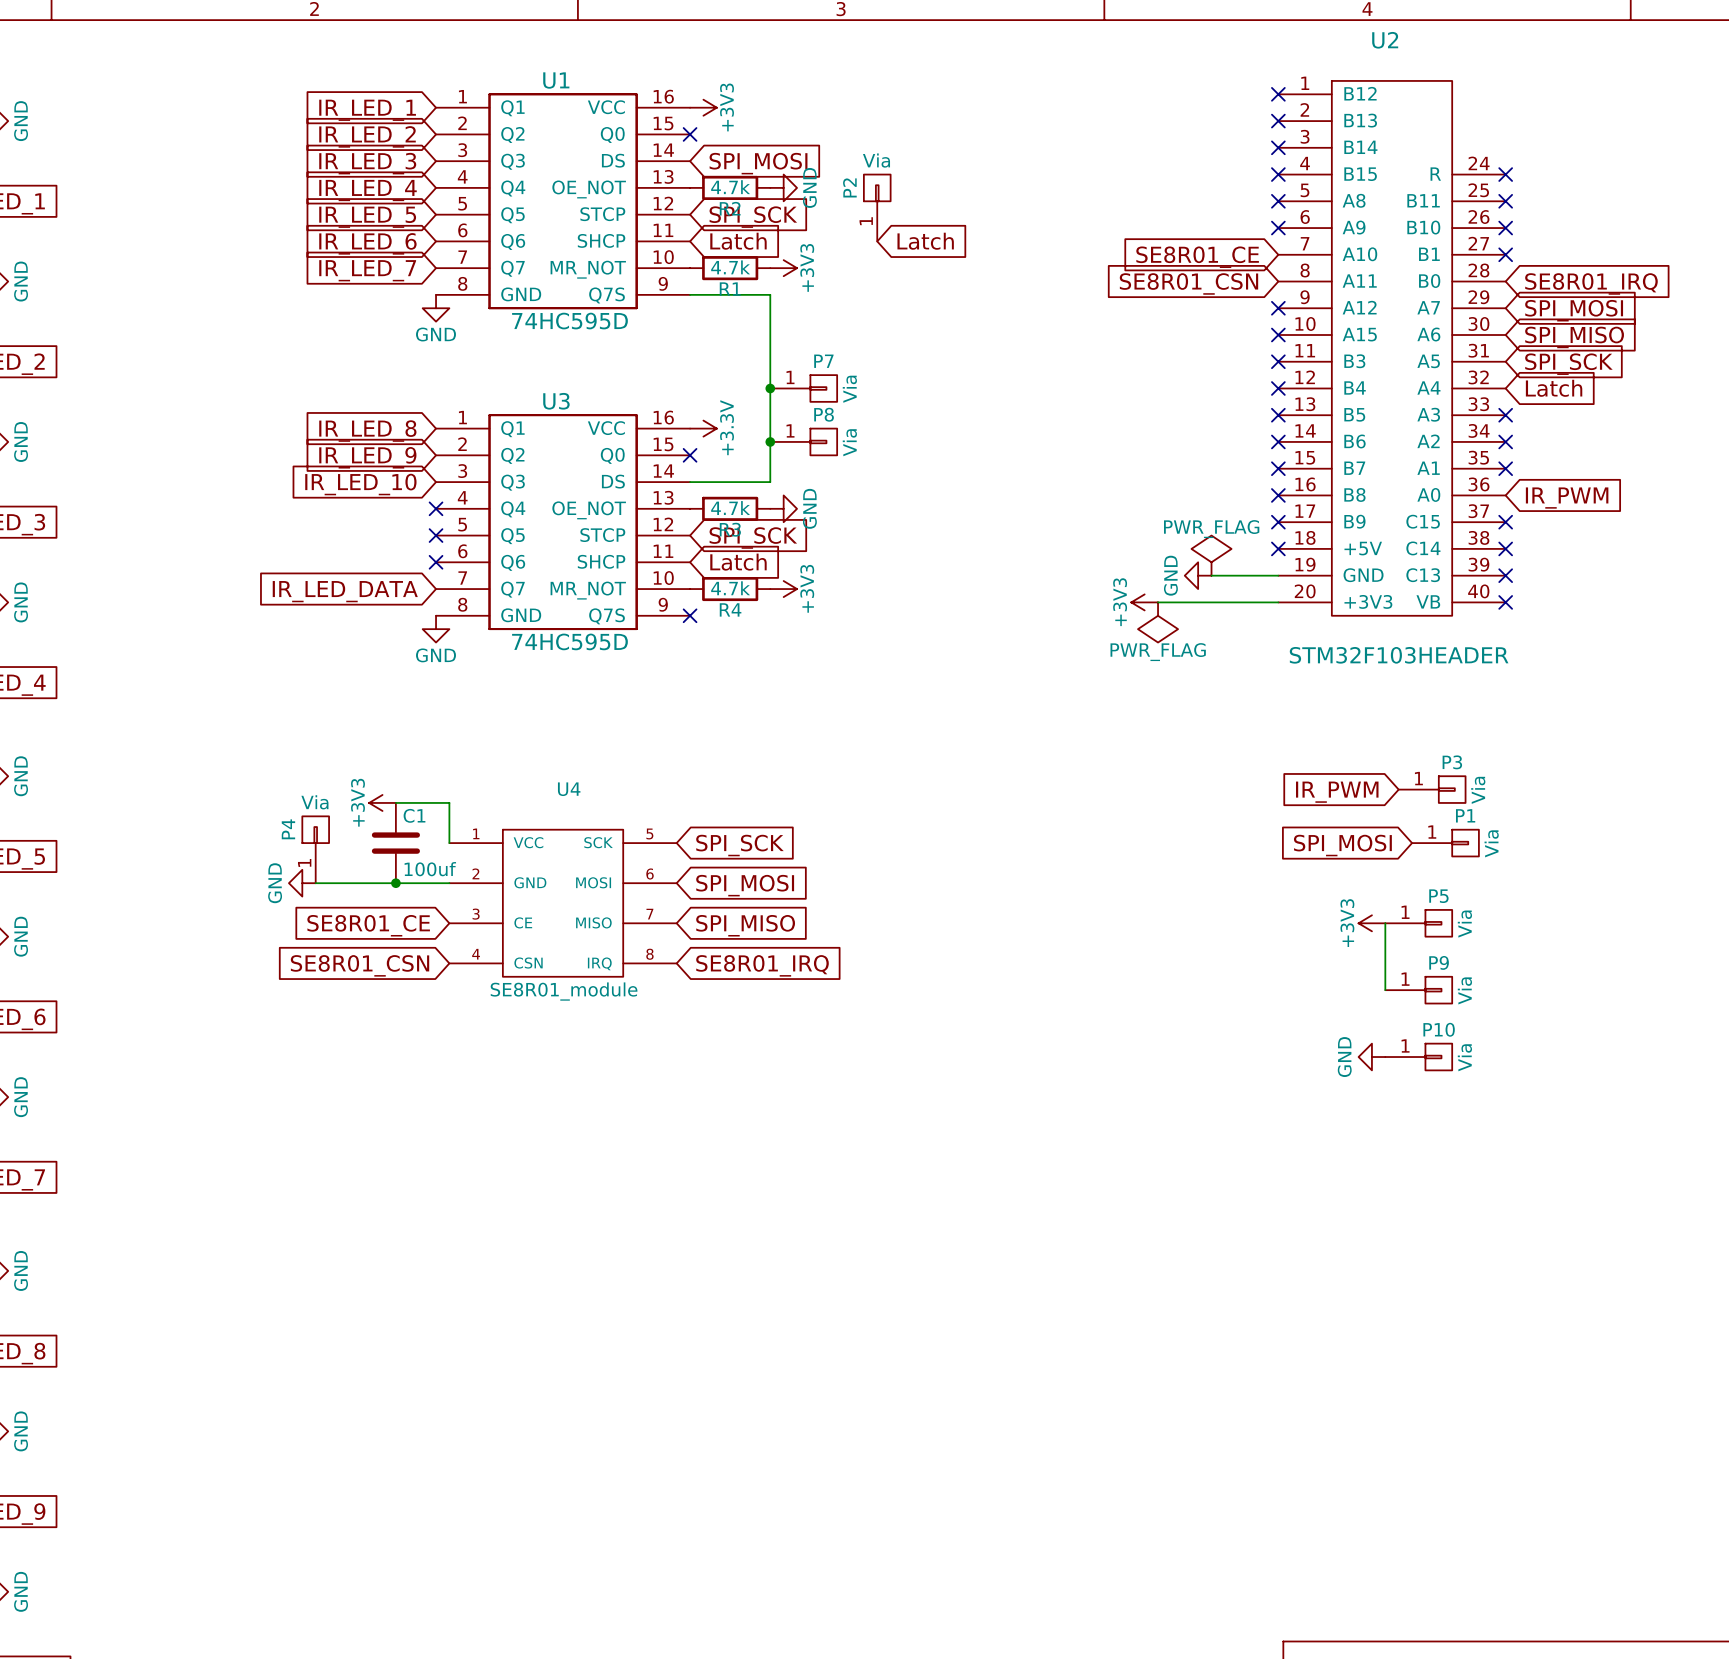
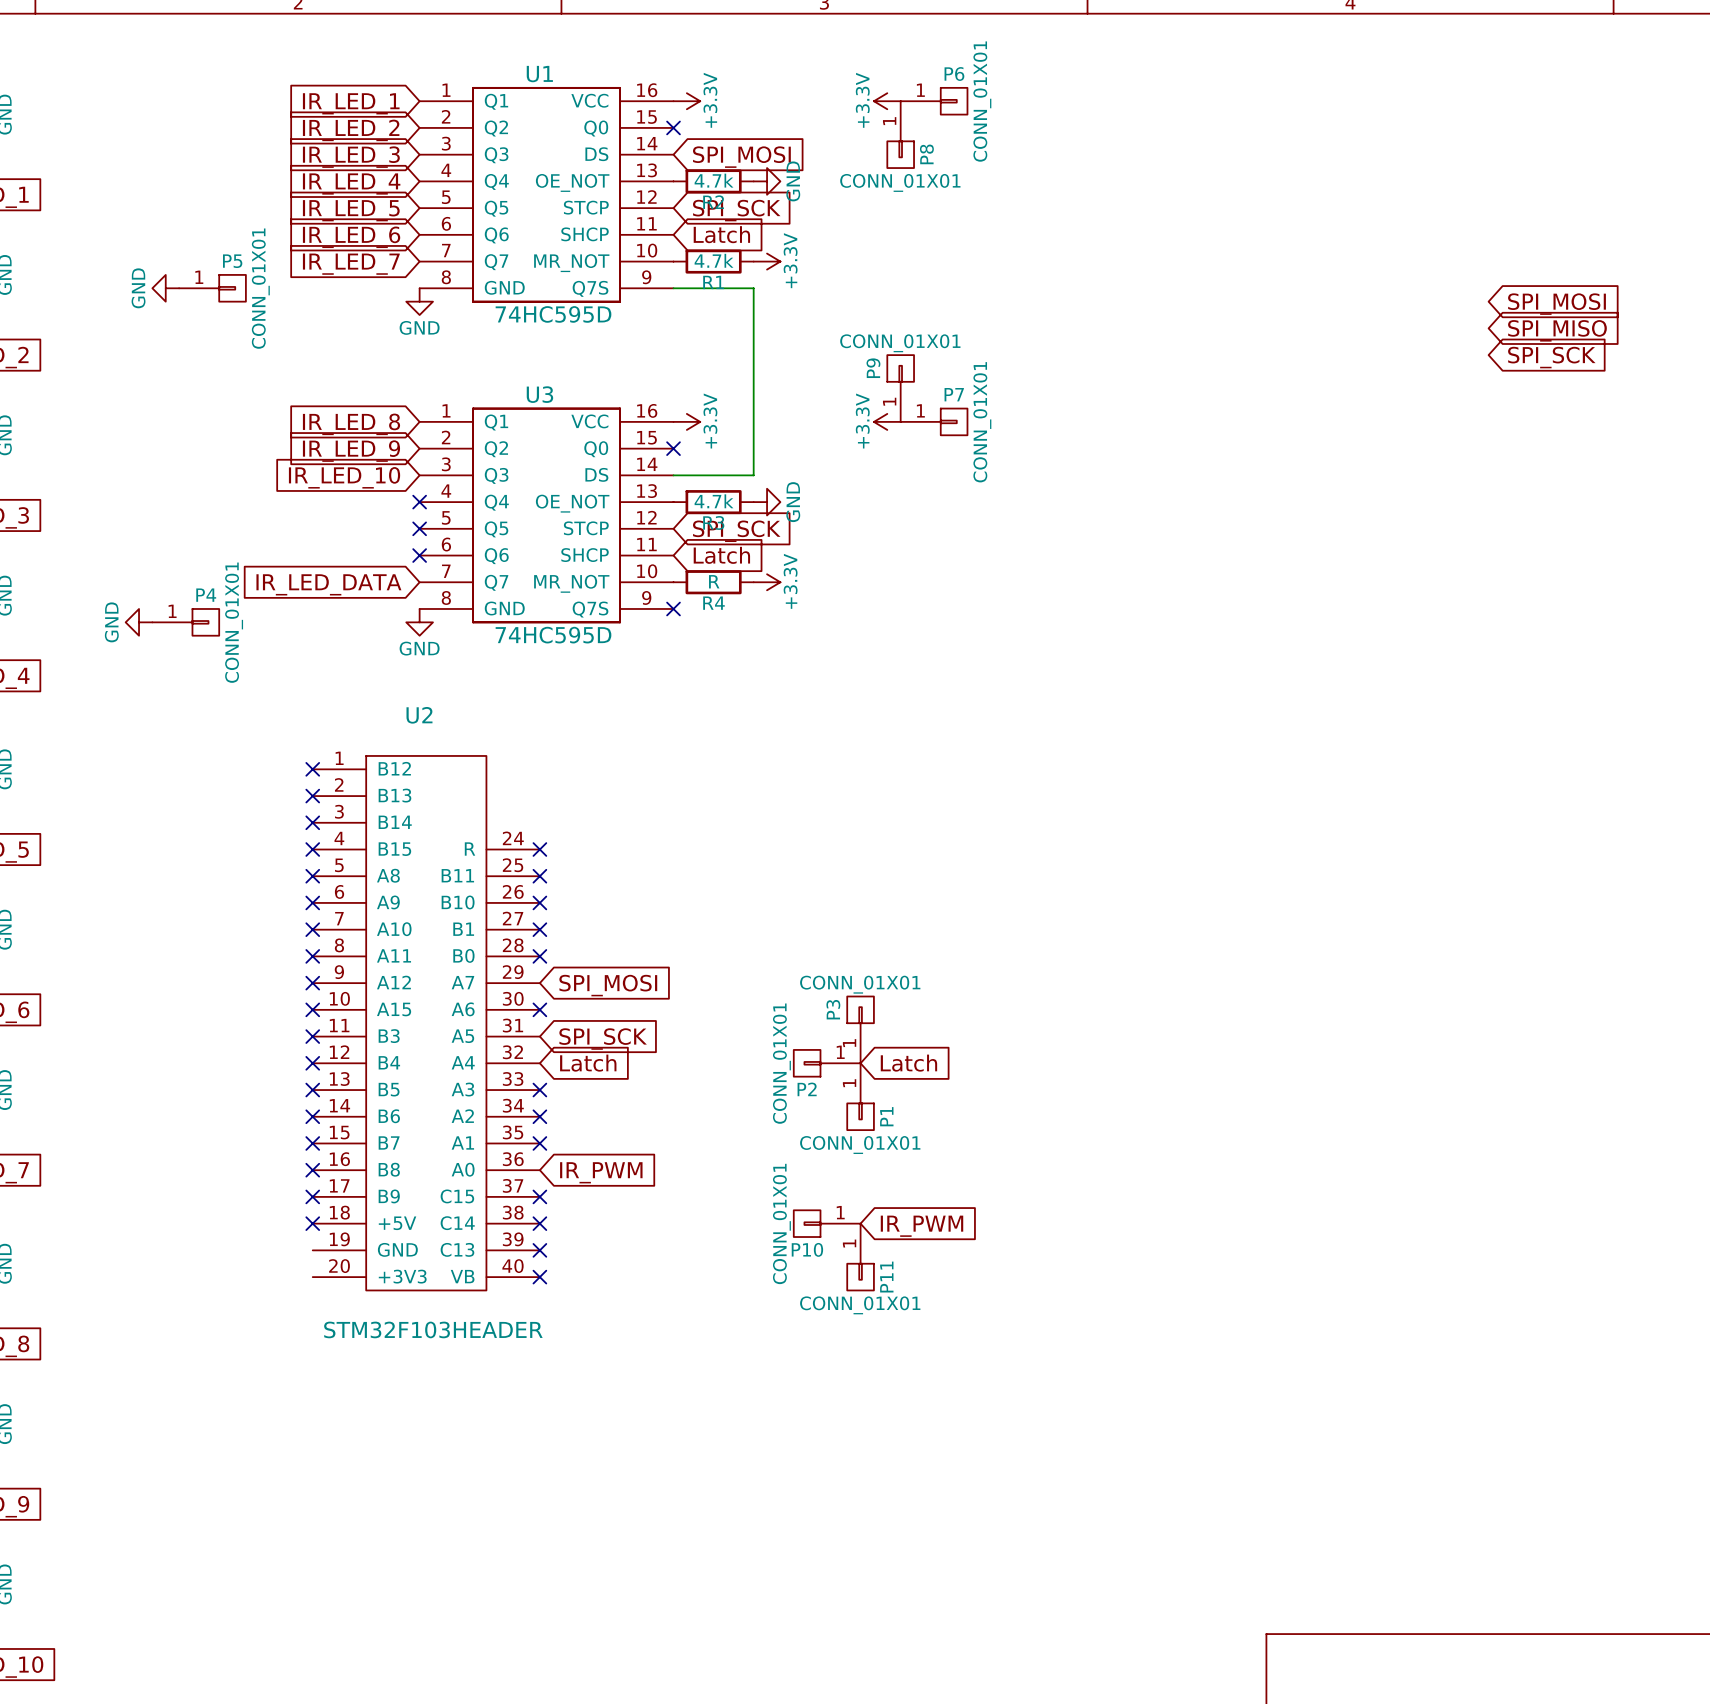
no-connect mark: (1278, 94) -> none
power symbol: +3V3 (703, 107) -> +3.3V (686, 101)
power symbol: none -> +3.3V (887, 101)
P6: none -> CONN_01X01 (934, 101)
no-connect mark: (1278, 121) -> none
no-connect mark: (1278, 147) -> none
P2 value: Via (876, 160) -> CONN_01X01 (781, 1063)
no-connect mark: (1278, 174) -> none
no-connect mark: (1505, 174) -> none
P2 rotation: 0° (877, 187) -> 90° counterclockwise (807, 1063)
no-connect mark: (1278, 201) -> none
no-connect mark: (1505, 201) -> none
P2 position: (877, 207) -> (827, 1063)
no-connect mark: (1278, 228) -> none
no-connect mark: (1505, 228) -> none
global label: Latch (925, 241) -> none
no-connect mark: (1505, 254) -> none
global label: SE8R01_CE (1197, 257) -> none
power symbol: +3V3 (783, 268) -> +3.3V (767, 261)
global label: SE8R01_CSN (1188, 283) -> none
global label: SE8R01_IRQ (1591, 283) -> none
power symbol: none -> GND (165, 288)
no-connect mark: (1278, 308) -> none
no-connect mark: (1278, 335) -> none
U2 position: (1392, 348) -> (426, 1023)
no-connect mark: (1278, 361) -> none
junction: (770, 388) -> none
P7 position: (803, 388) -> (934, 421)
no-connect mark: (1278, 388) -> none
global label: Latch (1554, 388) -> none
P7 value: Via (849, 389) -> CONN_01X01 (982, 422)
no-connect mark: (1278, 415) -> none
no-connect mark: (1505, 415) -> none
power symbol: none -> +3.3V (887, 421)
junction: (770, 441) -> none
P8 position: (803, 441) -> (900, 134)
P8 rotation: 0° (823, 441) -> 90° clockwise (900, 154)
no-connect mark: (1278, 441) -> none
no-connect mark: (1505, 441) -> none
P8 value: Via (849, 442) -> CONN_01X01 (900, 182)
no-connect mark: (1278, 468) -> none
no-connect mark: (1505, 468) -> none
no-connect mark: (1278, 495) -> none
global label: IR_PWM (1567, 498) -> none
no-connect mark: (1278, 522) -> none
no-connect mark: (1505, 522) -> none
no-connect mark: (1278, 548) -> none
no-connect mark: (1505, 548) -> none
power symbol: PWR_FLAG (1211, 555) -> none
power symbol: GND (1198, 575) -> none
wire: (1211, 575) (1278, 575) -> none
no-connect mark: (1505, 575) -> none
R4 value: 4.7k (730, 588) -> R (714, 581)
power symbol: +3V3 (783, 589) -> +3.3V (767, 582)
power symbol: +3V3 (1144, 602) -> none
wire: (1158, 602) (1278, 602) -> none
no-connect mark: (1505, 602) -> none
power symbol: PWR_FLAG (1158, 622) -> none
power symbol: none -> GND (139, 622)
no-connect mark: none -> (312, 769)
P3 position: (1432, 789) -> (860, 1029)
P3 rotation: 0° (1452, 789) -> 90° counterclockwise (860, 1009)
P3 value: Via (1478, 790) -> CONN_01X01 (860, 984)
global label: IR_PWM (1337, 792) -> none
P4 value: Via (314, 802) -> CONN_01X01 (234, 622)
no-connect mark: none -> (312, 796)
power symbol: +3V3 (382, 802) -> none
wire: (395, 802) (449, 802) (449, 843) -> none
P4 rotation: 0° (315, 829) -> 90° clockwise (205, 622)
no-connect mark: none -> (312, 822)
C1: 100uf (395, 843) -> none
P1 position: (1445, 843) -> (860, 1096)
P1 rotation: 0° (1465, 843) -> 90° clockwise (860, 1116)
P1 value: Via (1491, 843) -> CONN_01X01 (860, 1145)
global label position: SPI_SCK (739, 845) -> SPI_SCK (603, 1039)
global label: SPI_MOSI (1342, 845) -> none
P4 position: (315, 849) -> (185, 622)
no-connect mark: none -> (312, 849)
no-connect mark: none -> (539, 849)
power symbol: GND (302, 883) -> none
wire: (315, 883) (449, 883) -> none
no-connect mark: none -> (312, 876)
junction: (395, 883) -> none
no-connect mark: none -> (539, 876)
global label position: SPI_MOSI (745, 885) -> SPI_MOSI (608, 985)
U4: SE8R01_module (563, 903) -> none
no-connect mark: none -> (312, 902)
no-connect mark: none -> (539, 902)
power symbol: +3V3 (1371, 923) -> none
wire: (1385, 923) (1385, 990) -> none
P5 position: (1418, 923) -> (212, 288)
P5 value: Via (1464, 924) -> CONN_01X01 (260, 288)
global label: SE8R01_CE (368, 925) -> none
global label: SPI_MISO (745, 925) -> none
no-connect mark: none -> (312, 929)
no-connect mark: none -> (539, 929)
no-connect mark: none -> (312, 956)
no-connect mark: none -> (539, 956)
global label: SE8R01_CSN (360, 965) -> none
global label: SE8R01_IRQ (762, 965) -> none
no-connect mark: none -> (312, 983)
P9 position: (1418, 990) -> (900, 388)
P9 rotation: 0° (1438, 990) -> 90° counterclockwise (900, 368)
P9 value: Via (1464, 990) -> CONN_01X01 (900, 343)
no-connect mark: none -> (312, 1009)
no-connect mark: none -> (539, 1009)
no-connect mark: none -> (312, 1036)
power symbol: GND (1371, 1057) -> none
P10 position: (1418, 1057) -> (827, 1223)
P10 rotation: 0° (1438, 1057) -> 180° (807, 1223)
P10 value: Via (1464, 1057) -> CONN_01X01 (781, 1223)
no-connect mark: none -> (312, 1063)
global label: none -> Latch (588, 1063)
global label: none -> Latch (908, 1063)
no-connect mark: none -> (312, 1090)
no-connect mark: none -> (539, 1090)
no-connect mark: none -> (312, 1116)
no-connect mark: none -> (539, 1116)
no-connect mark: none -> (312, 1143)
no-connect mark: none -> (539, 1143)
no-connect mark: none -> (312, 1170)
global label: none -> IR_PWM (601, 1172)
no-connect mark: none -> (312, 1196)
no-connect mark: none -> (539, 1196)
no-connect mark: none -> (312, 1223)
no-connect mark: none -> (539, 1223)
global label: none -> IR_PWM (921, 1226)
no-connect mark: none -> (539, 1250)
P11: none -> CONN_01X01 (860, 1257)
no-connect mark: none -> (539, 1277)

